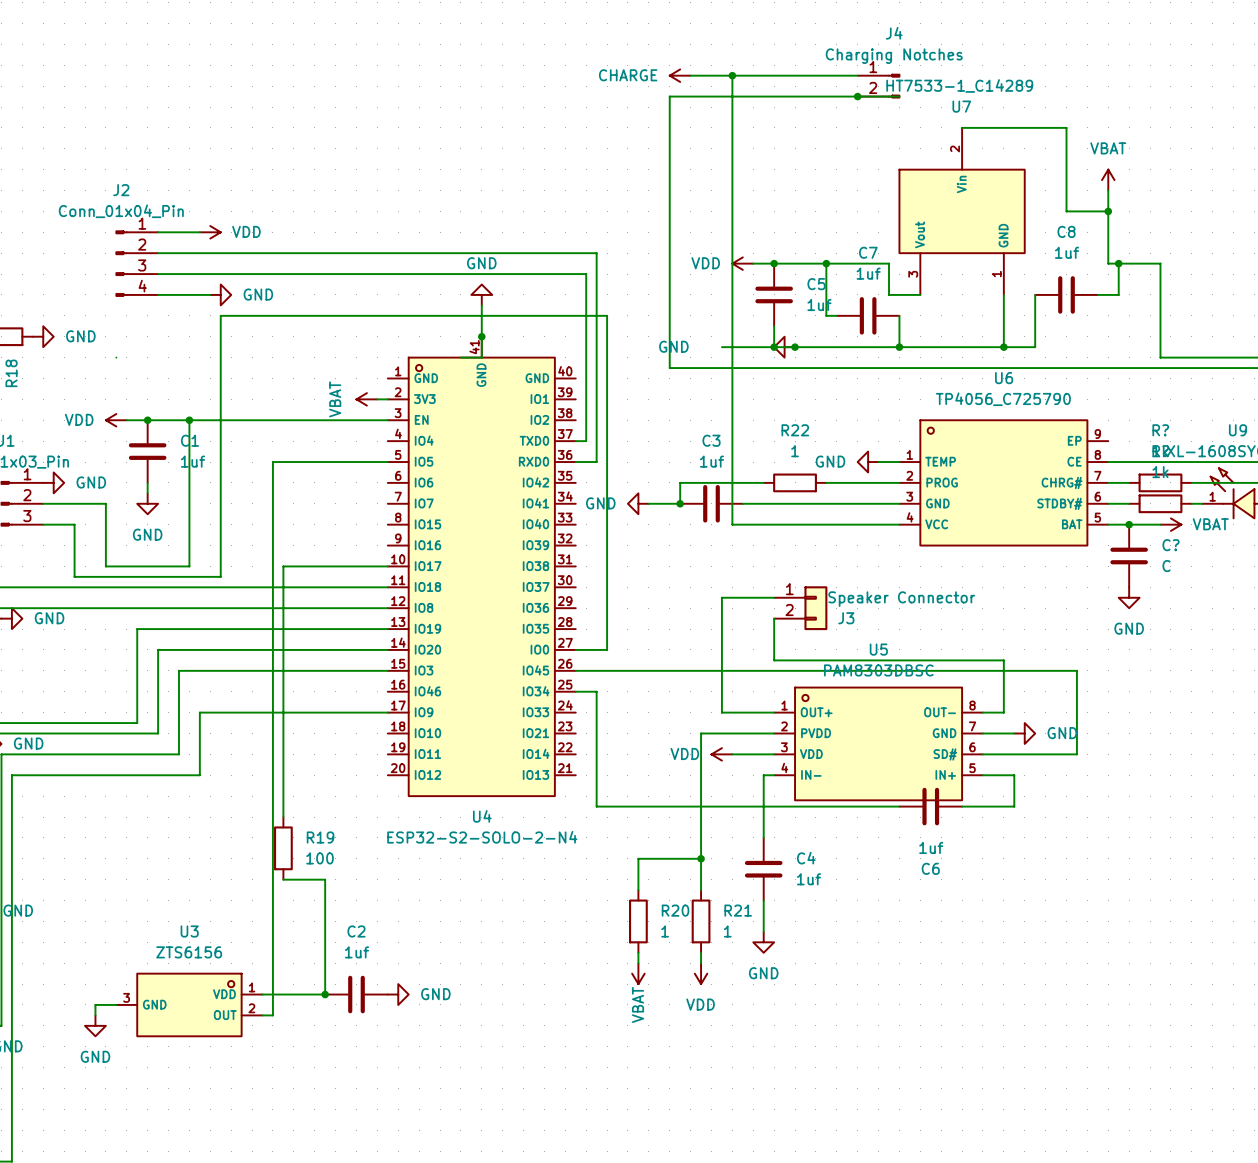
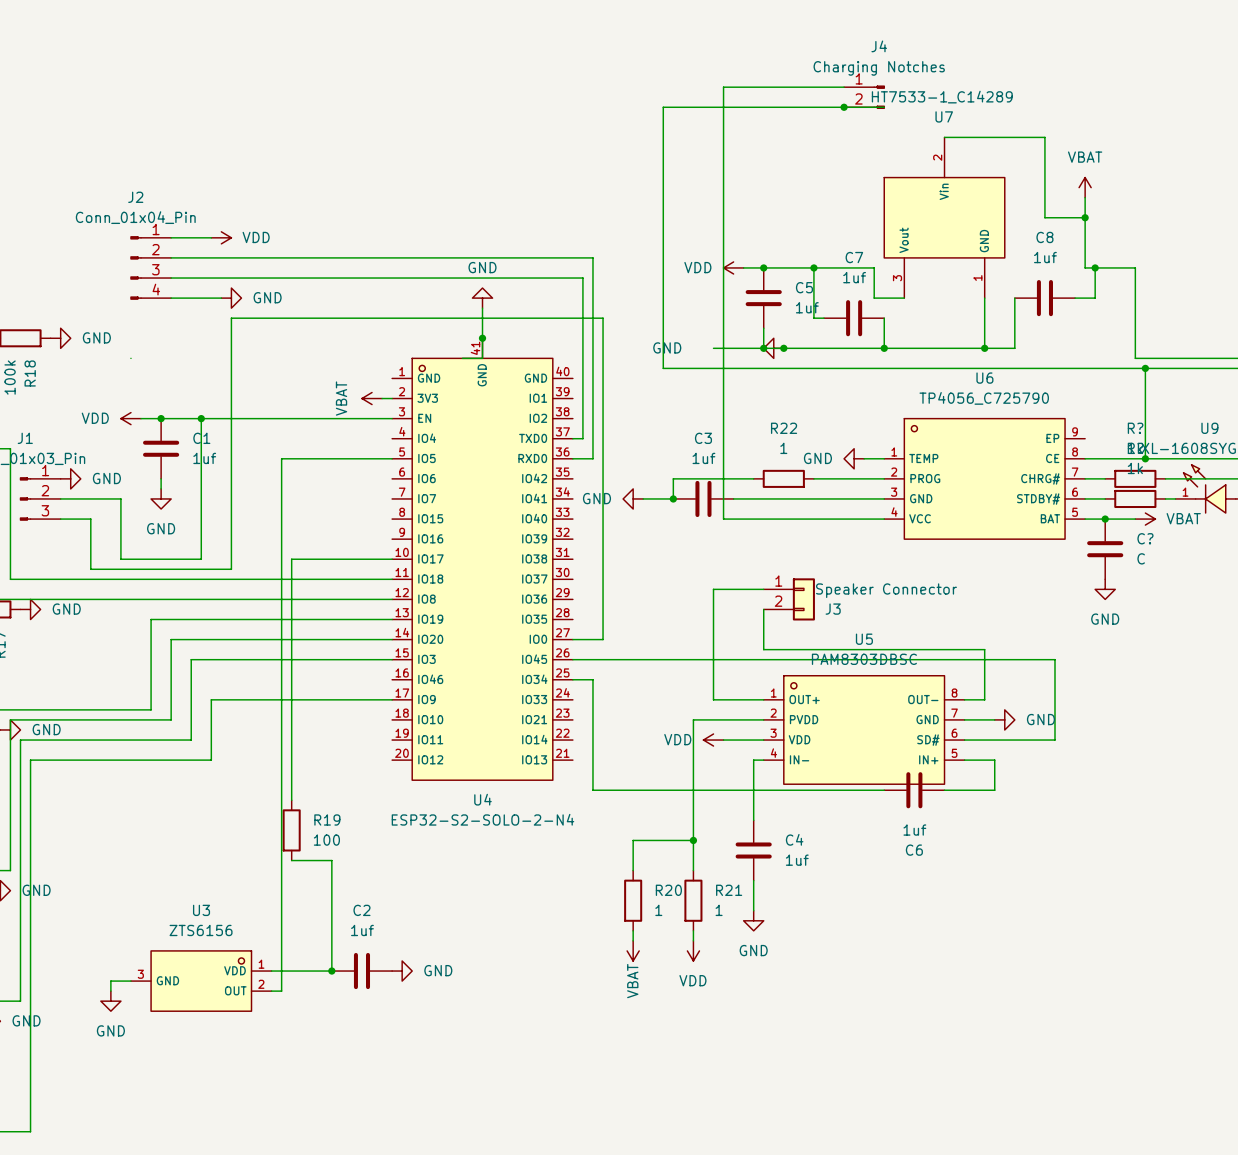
power symbol: CHARGE (680, 75) -> none
wire: (690, 75) (732, 75) -> none
junction: (732, 75) -> none
wire: none -> (1145, 368) (1145, 458)
junction: none -> (1145, 368)
junction: none -> (1145, 458)

